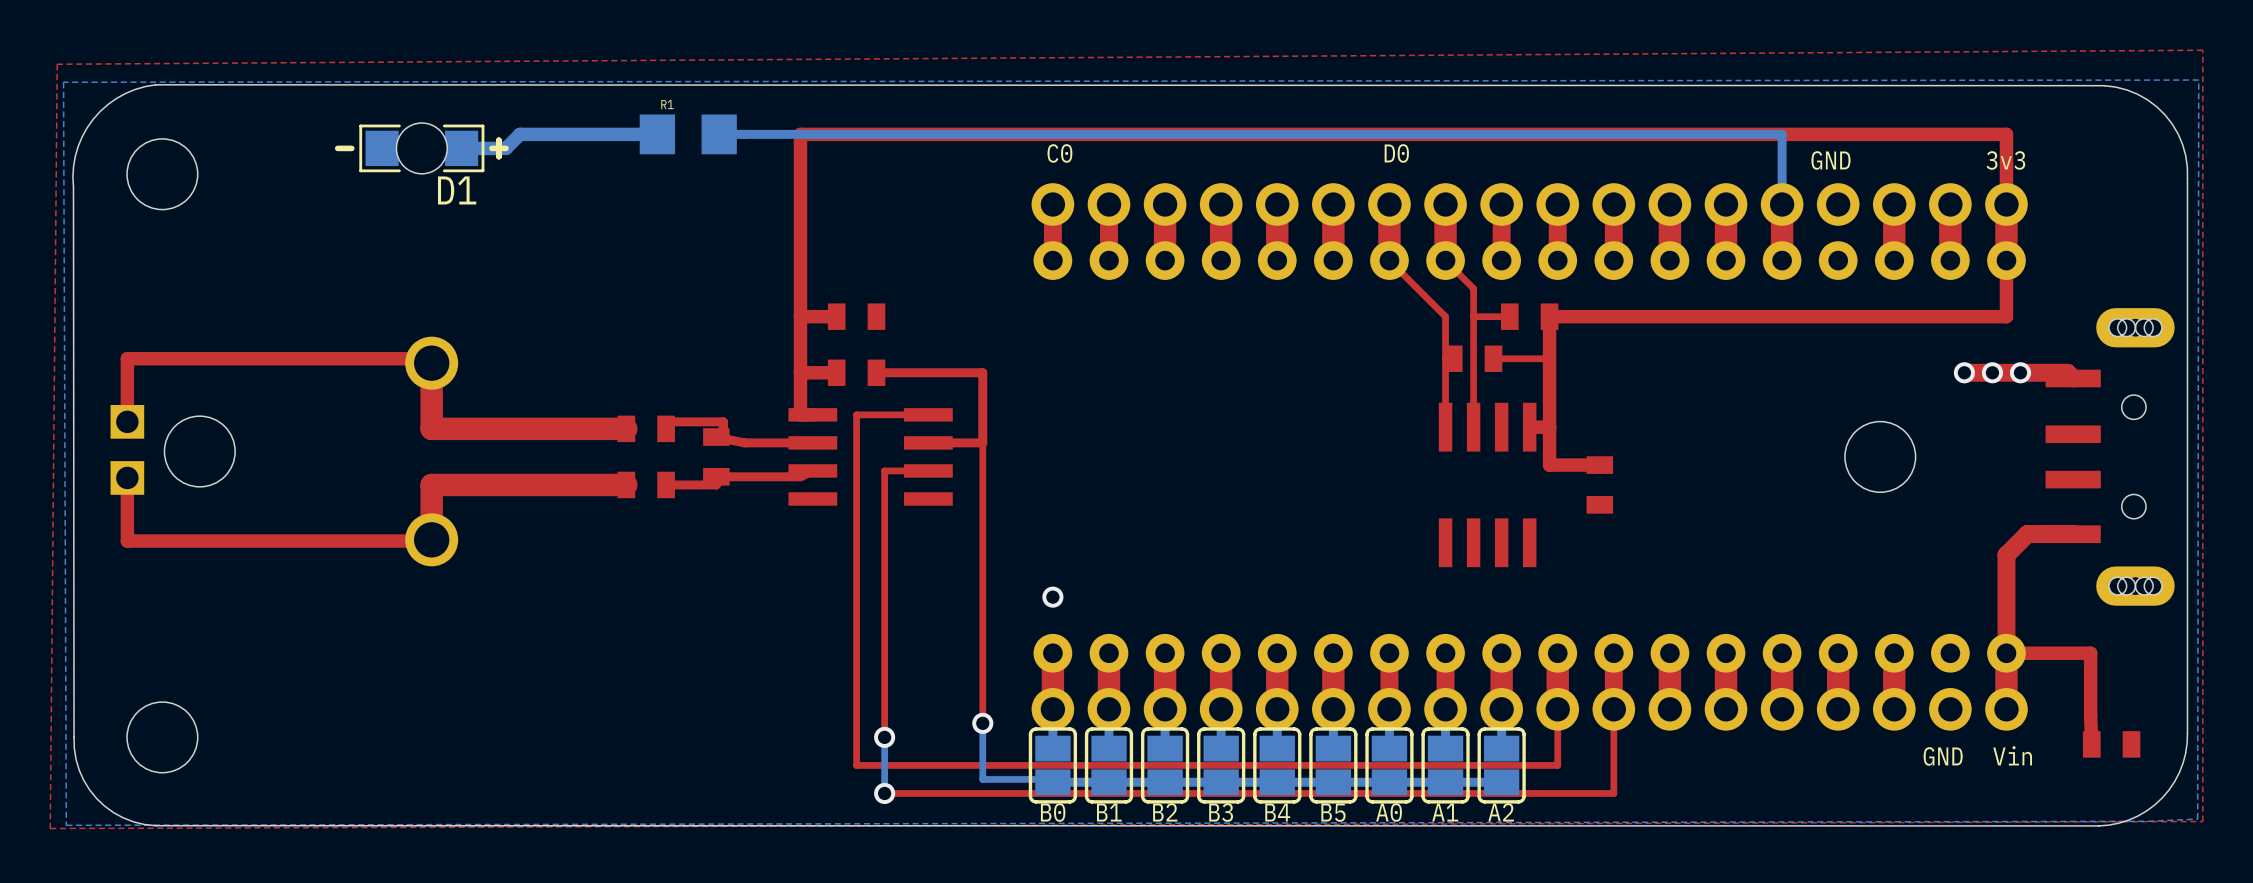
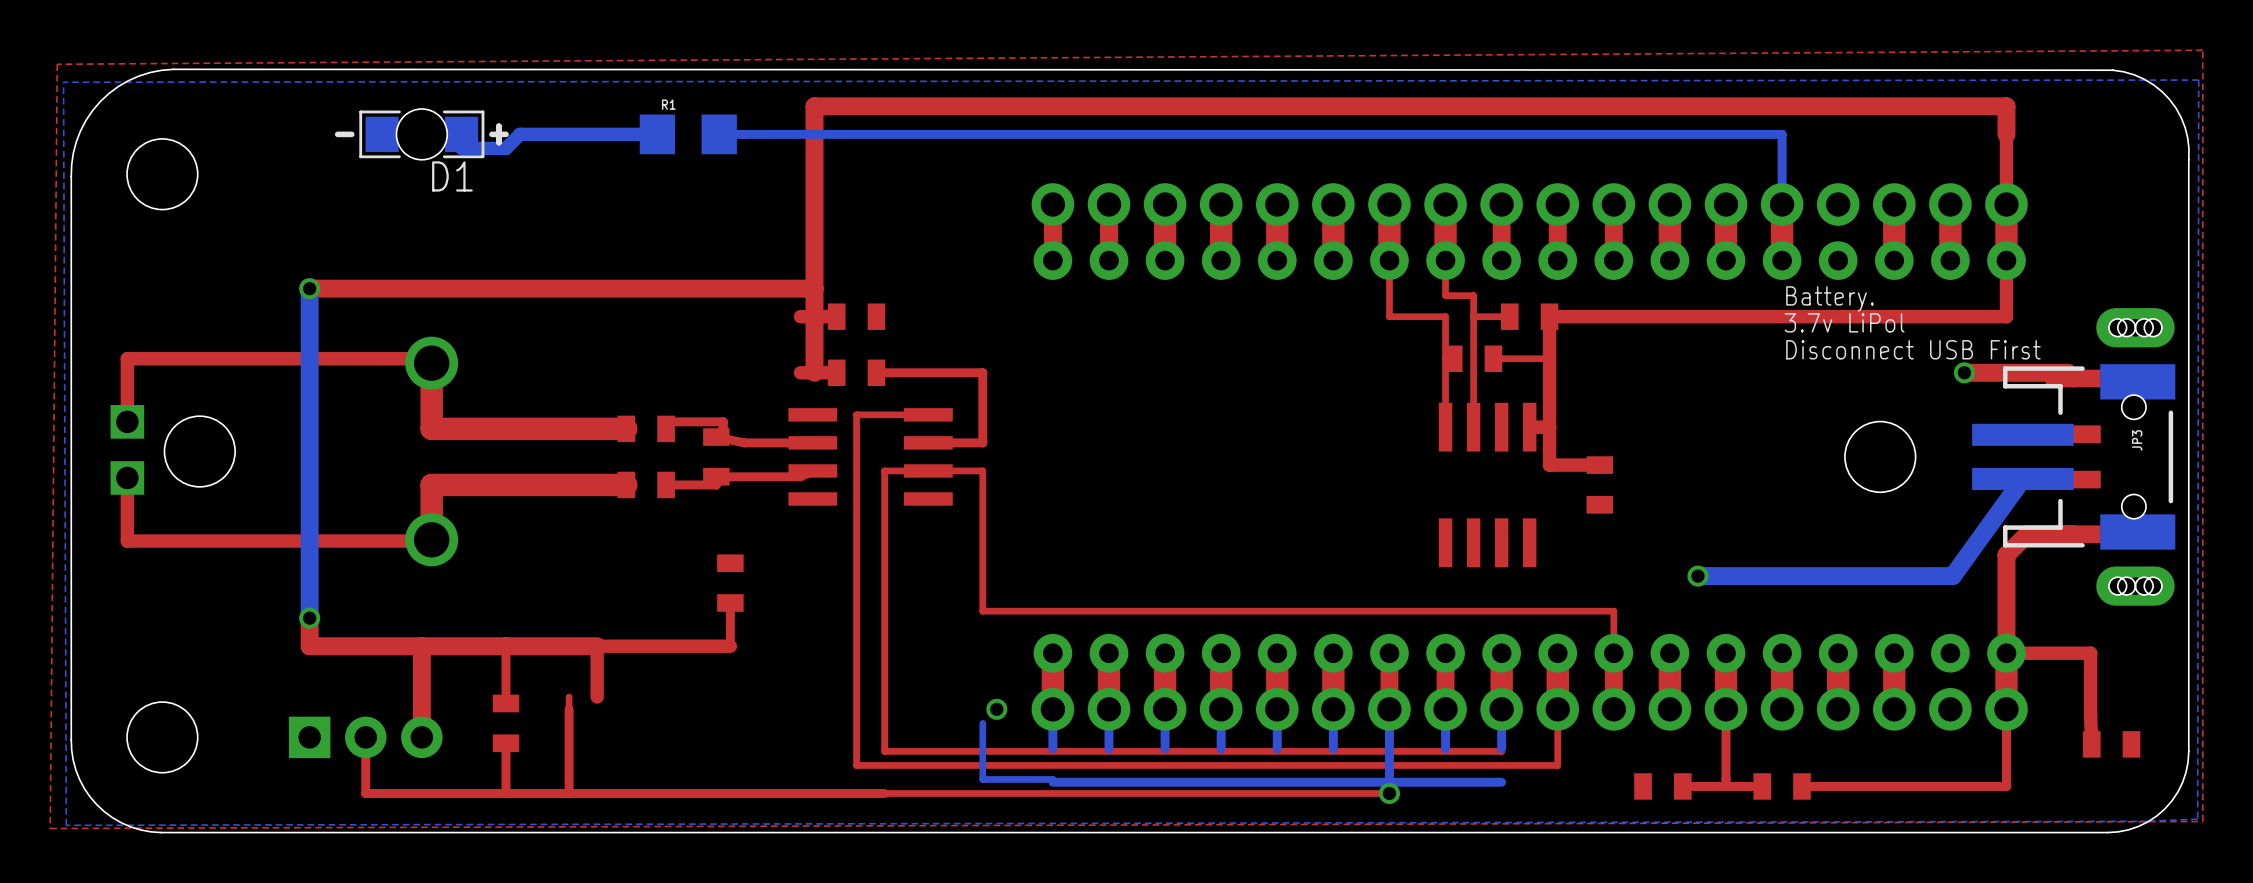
board edge: (155, 84) (2104, 85) (2126, 89) (2147, 99) (2165, 114) (2178, 133) (2182, 144) (2187, 167) (2187, 732) (2183, 763) (2168, 790) (2146, 810) (2118, 823) (2098, 825) (155, 825) (133, 821) (113, 812) (96, 798) (83, 780) (74, 748) (72, 177) (78, 146) (87, 127) (100, 111) (125, 93) (155, 84) -> (173, 69) (2113, 70) (2134, 74) (2153, 84) (2169, 99) (2181, 117) (2188, 149) (2188, 751) (2182, 782) (2172, 800) (2157, 815) (2138, 826) (2107, 832) (160, 832) (130, 826) (104, 811) (90, 797) (75, 770) (71, 750) (71, 164) (80, 130) (100, 101) (118, 86) (139, 76) (173, 69)
top track: (2006, 134) (800, 134) (800, 414) (812, 414) -> (2006, 134) (2006, 106) (814, 106) (814, 372)
D1 position: (421, 148) -> (421, 134)
text: C0 (1059, 153) -> none
text: D0 (1396, 153) -> none
text: GND (1830, 160) -> none
text: 3v3 (2005, 160) -> none
top track: (1389, 260) (1445, 316) -> (1389, 260) (1389, 316) (1445, 316)
top track: (1445, 260) (1473, 288) (1473, 295) -> (1445, 260) (1445, 295) (1473, 295)
bottom track: none -> (309, 288) (309, 618)
via: none -> (309, 288)
top track: none -> (814, 288) (309, 288)
text: none -> Battery. (1829, 298)
text: none -> 3.7v LiPol (1844, 322)
text: none -> Disconnect USB First (1913, 349)
via: (1992, 372) -> none
via: (2020, 372) -> none
top track: (982, 442) (982, 470) -> (928, 470) (982, 470)
JP3: none -> (2073, 456)
bottom track: none -> (2022, 479) (1952, 576) (1697, 576)
via: none -> (1697, 576)
part: none -> (730, 583)
via: (1052, 597) -> none
top track: none -> (730, 603) (730, 646) (309, 646) (309, 618)
top track: (982, 611) (982, 723) -> none
via: none -> (309, 618)
top track: none -> (597, 645) (597, 696)
top track: none -> (421, 646) (421, 737)
top track: none -> (506, 646) (506, 703)
top track: none -> (1501, 653) (1501, 751) (884, 751) (884, 737)
top track: (1613, 653) (1613, 793) (1389, 793) -> (1613, 653) (1613, 611) (982, 611)
top track: none -> (569, 696) (569, 793)
top track: none -> (1726, 709) (1726, 786)
top track: none -> (2006, 709) (2006, 786) (1801, 786)
part: none -> (506, 723)
via position: (982, 723) -> (996, 709)
top track: none -> (365, 737) (365, 793) (884, 793)
part: none -> (365, 737)
bottom track: (884, 737) (884, 793) -> none
via: (884, 737) -> none
top track: none -> (506, 743) (506, 793)
bottom track: none -> (1389, 748) (1389, 793)
text: Vin (2012, 755) -> none
text: GND (1943, 756) -> none
part: (1052, 765) -> none
part: (1108, 765) -> none
part: (1165, 765) -> none
part: (1221, 765) -> none
part: (1277, 765) -> none
part: (1333, 765) -> none
part: (1389, 765) -> none
part: (1445, 765) -> none
part: (1501, 765) -> none
part: none -> (1662, 786)
top track: none -> (1762, 786) (1682, 786)
part: none -> (1782, 786)
via: (884, 793) -> none
via: none -> (1389, 793)
text: B0 (1053, 812) -> none
text: B1 (1109, 812) -> none
text: B2 (1165, 812) -> none
text: B3 (1221, 812) -> none
text: B4 (1277, 812) -> none
text: B5 (1333, 812) -> none
text: A0 (1389, 812) -> none
text: A1 (1445, 812) -> none
text: A2 (1501, 812) -> none

